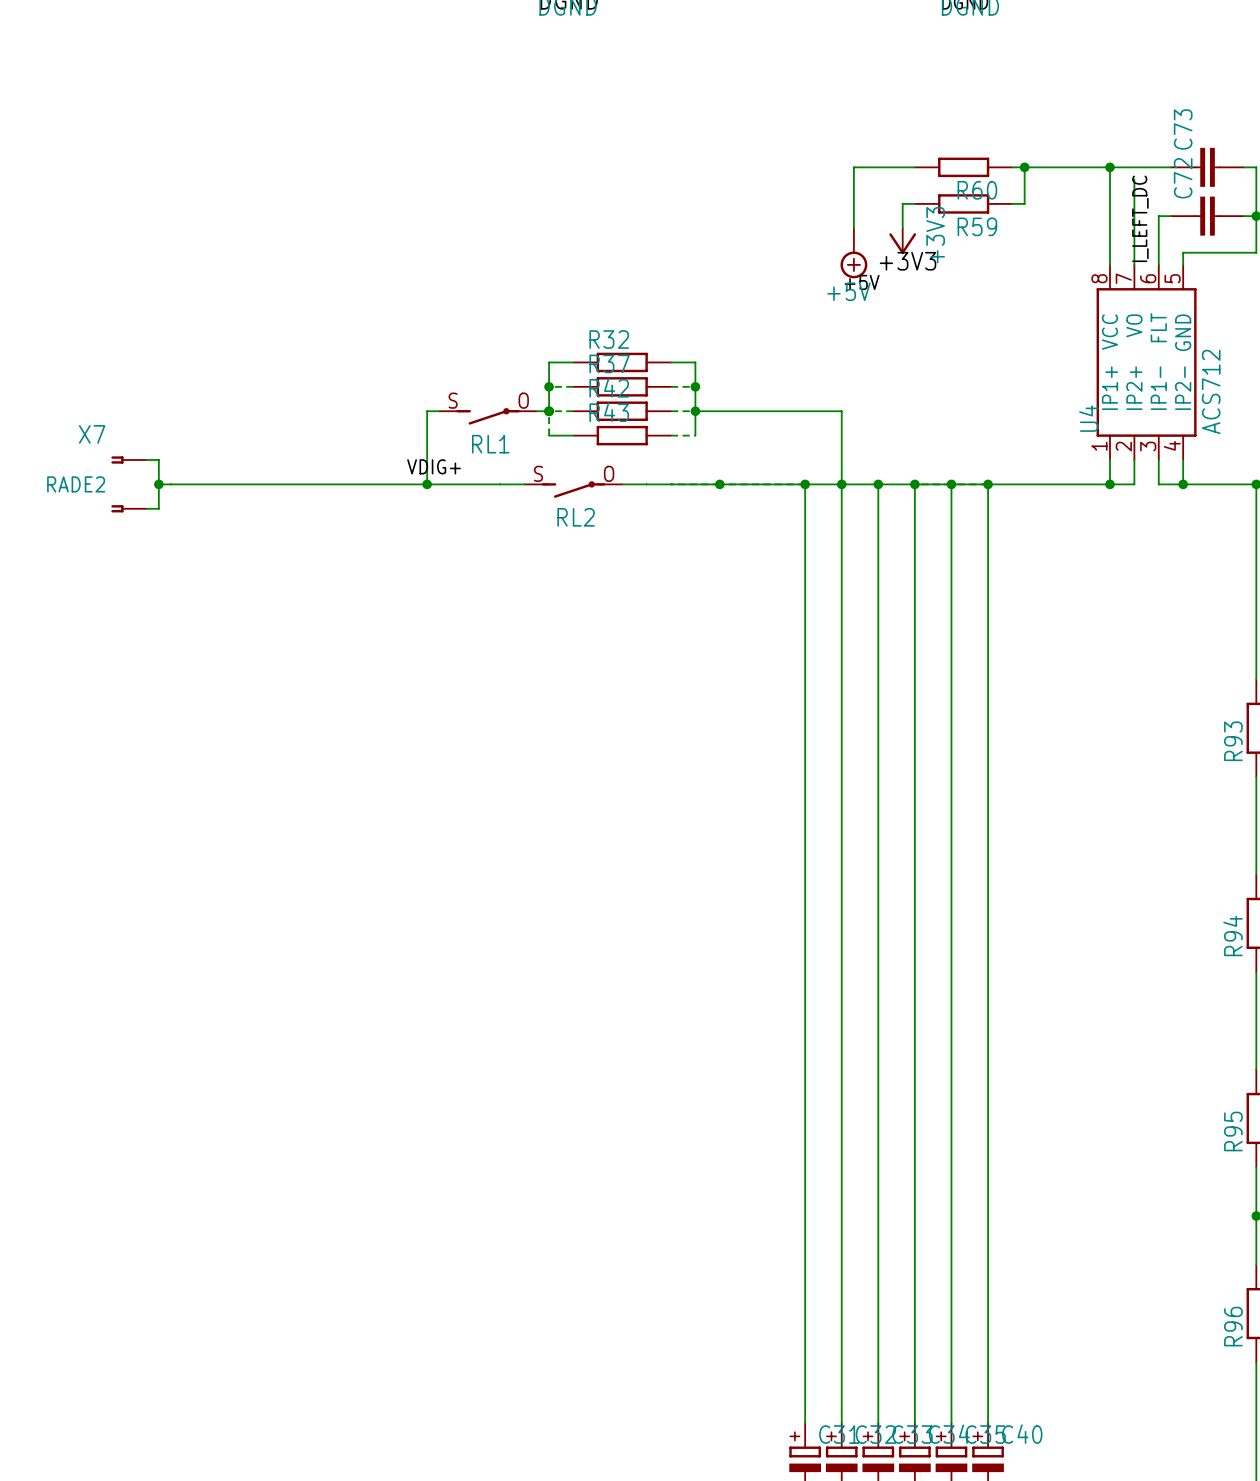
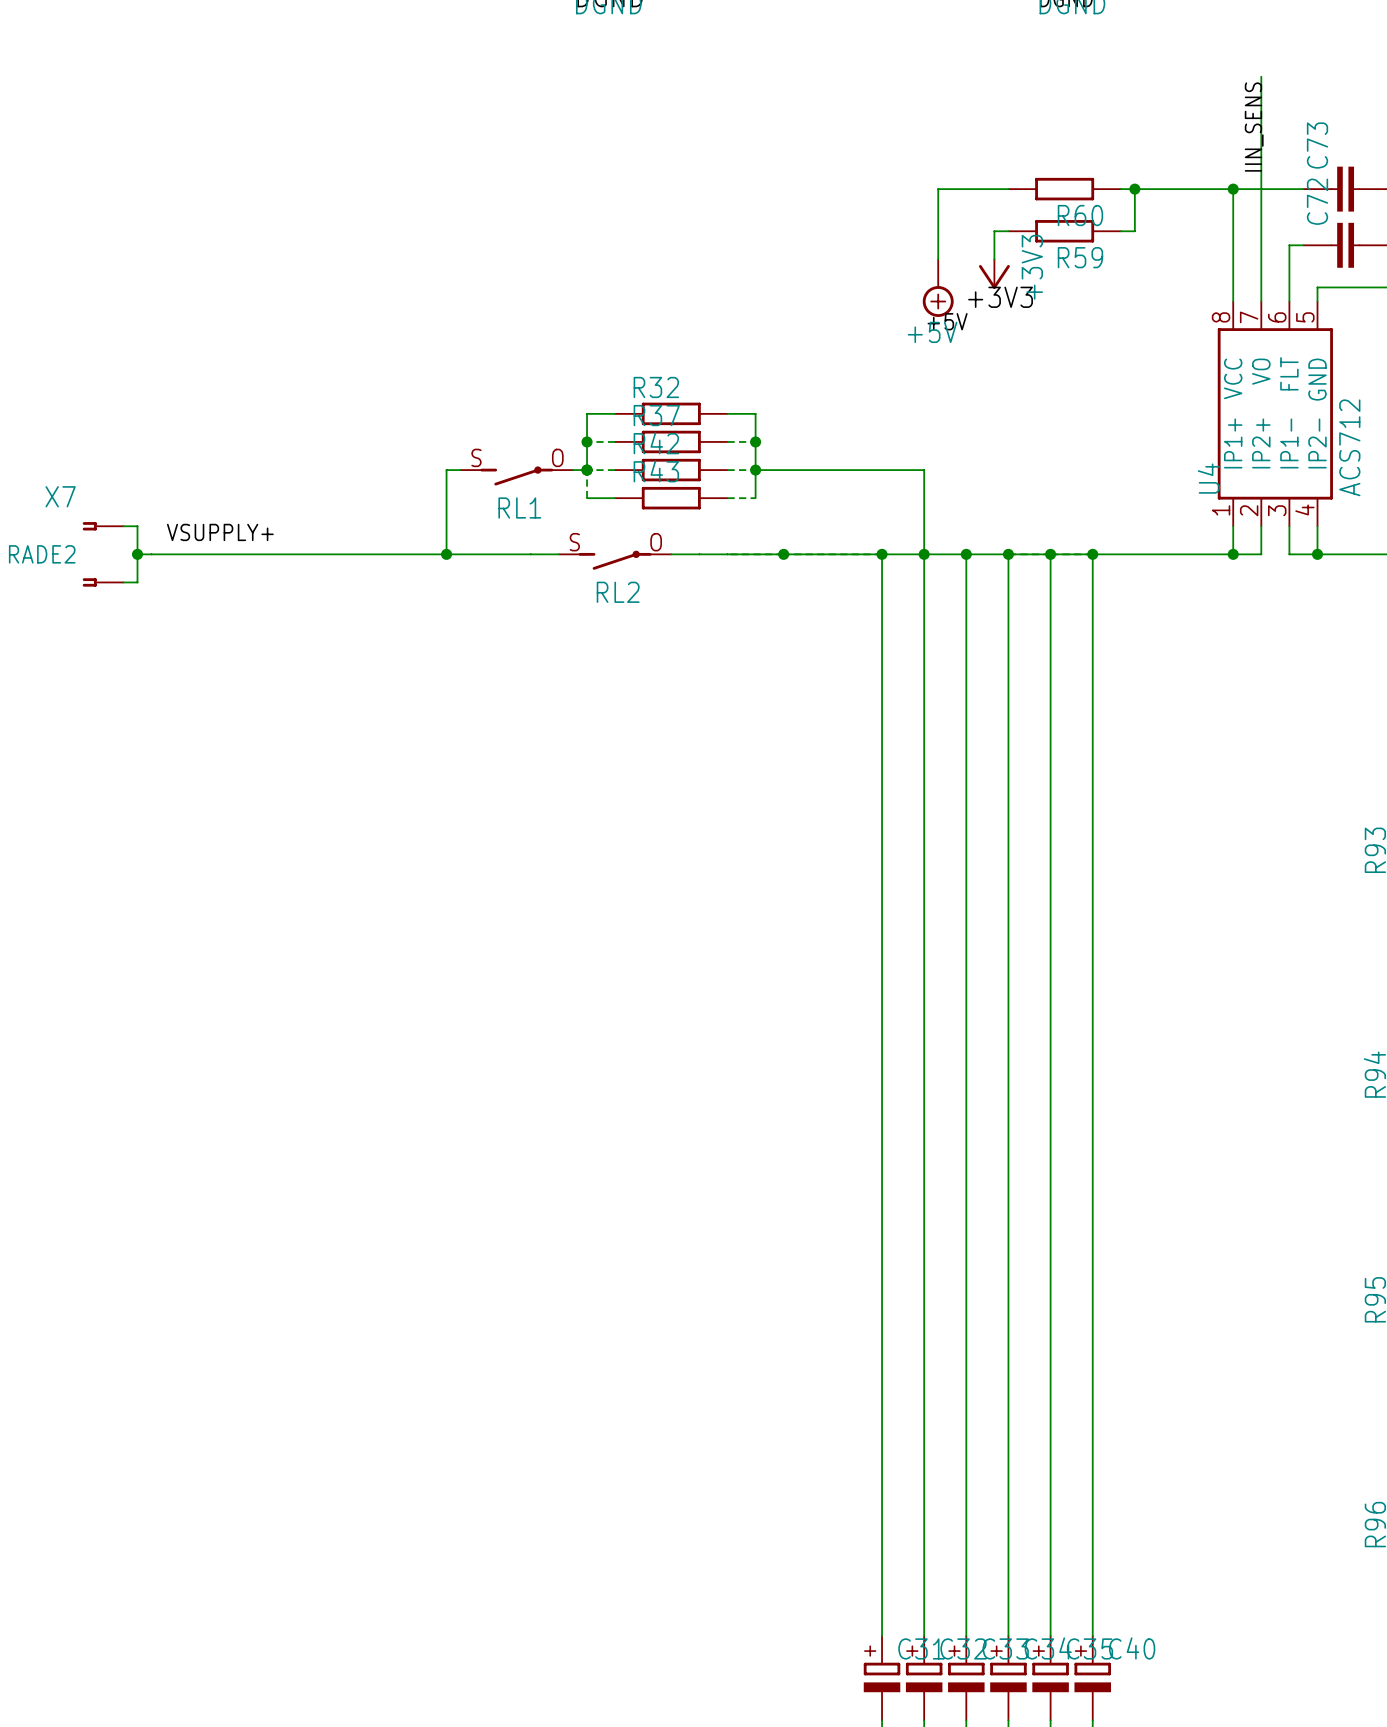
wire: none -> (1261, 76) (1261, 203)
label: none -> IIN_SENS (1254, 127)
label: I_LEFT_DC (1140, 218) -> none
label: none -> VSUPPLY+ (220, 532)
label: VDIG+ (434, 466) -> none

